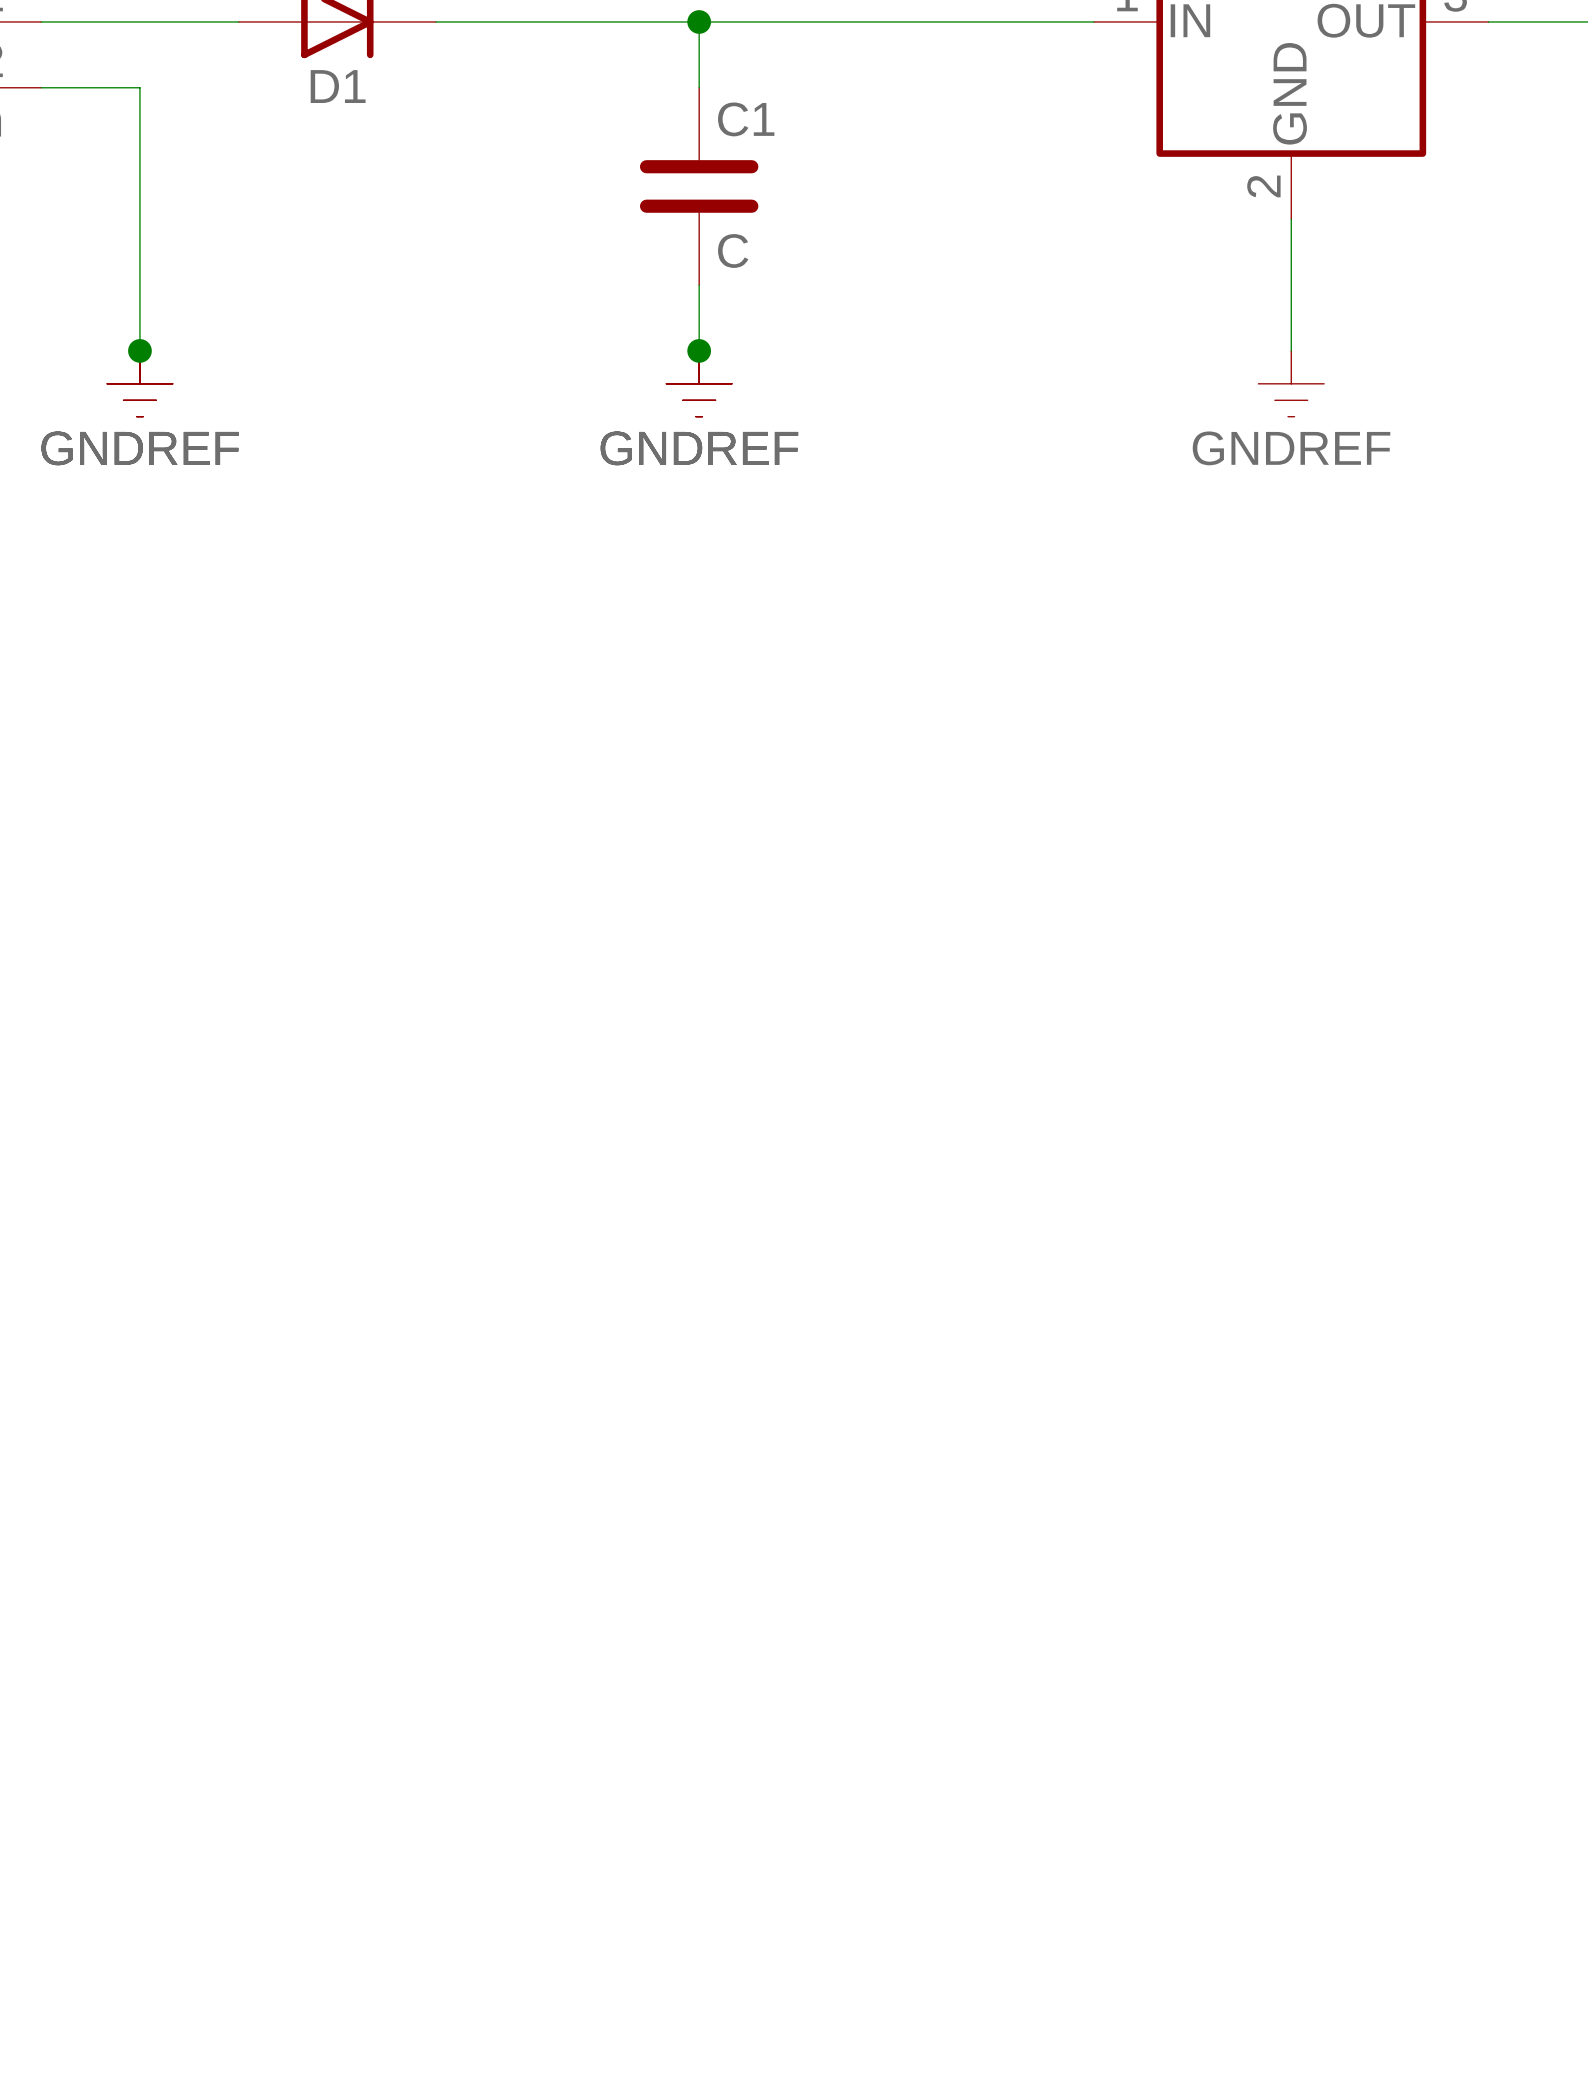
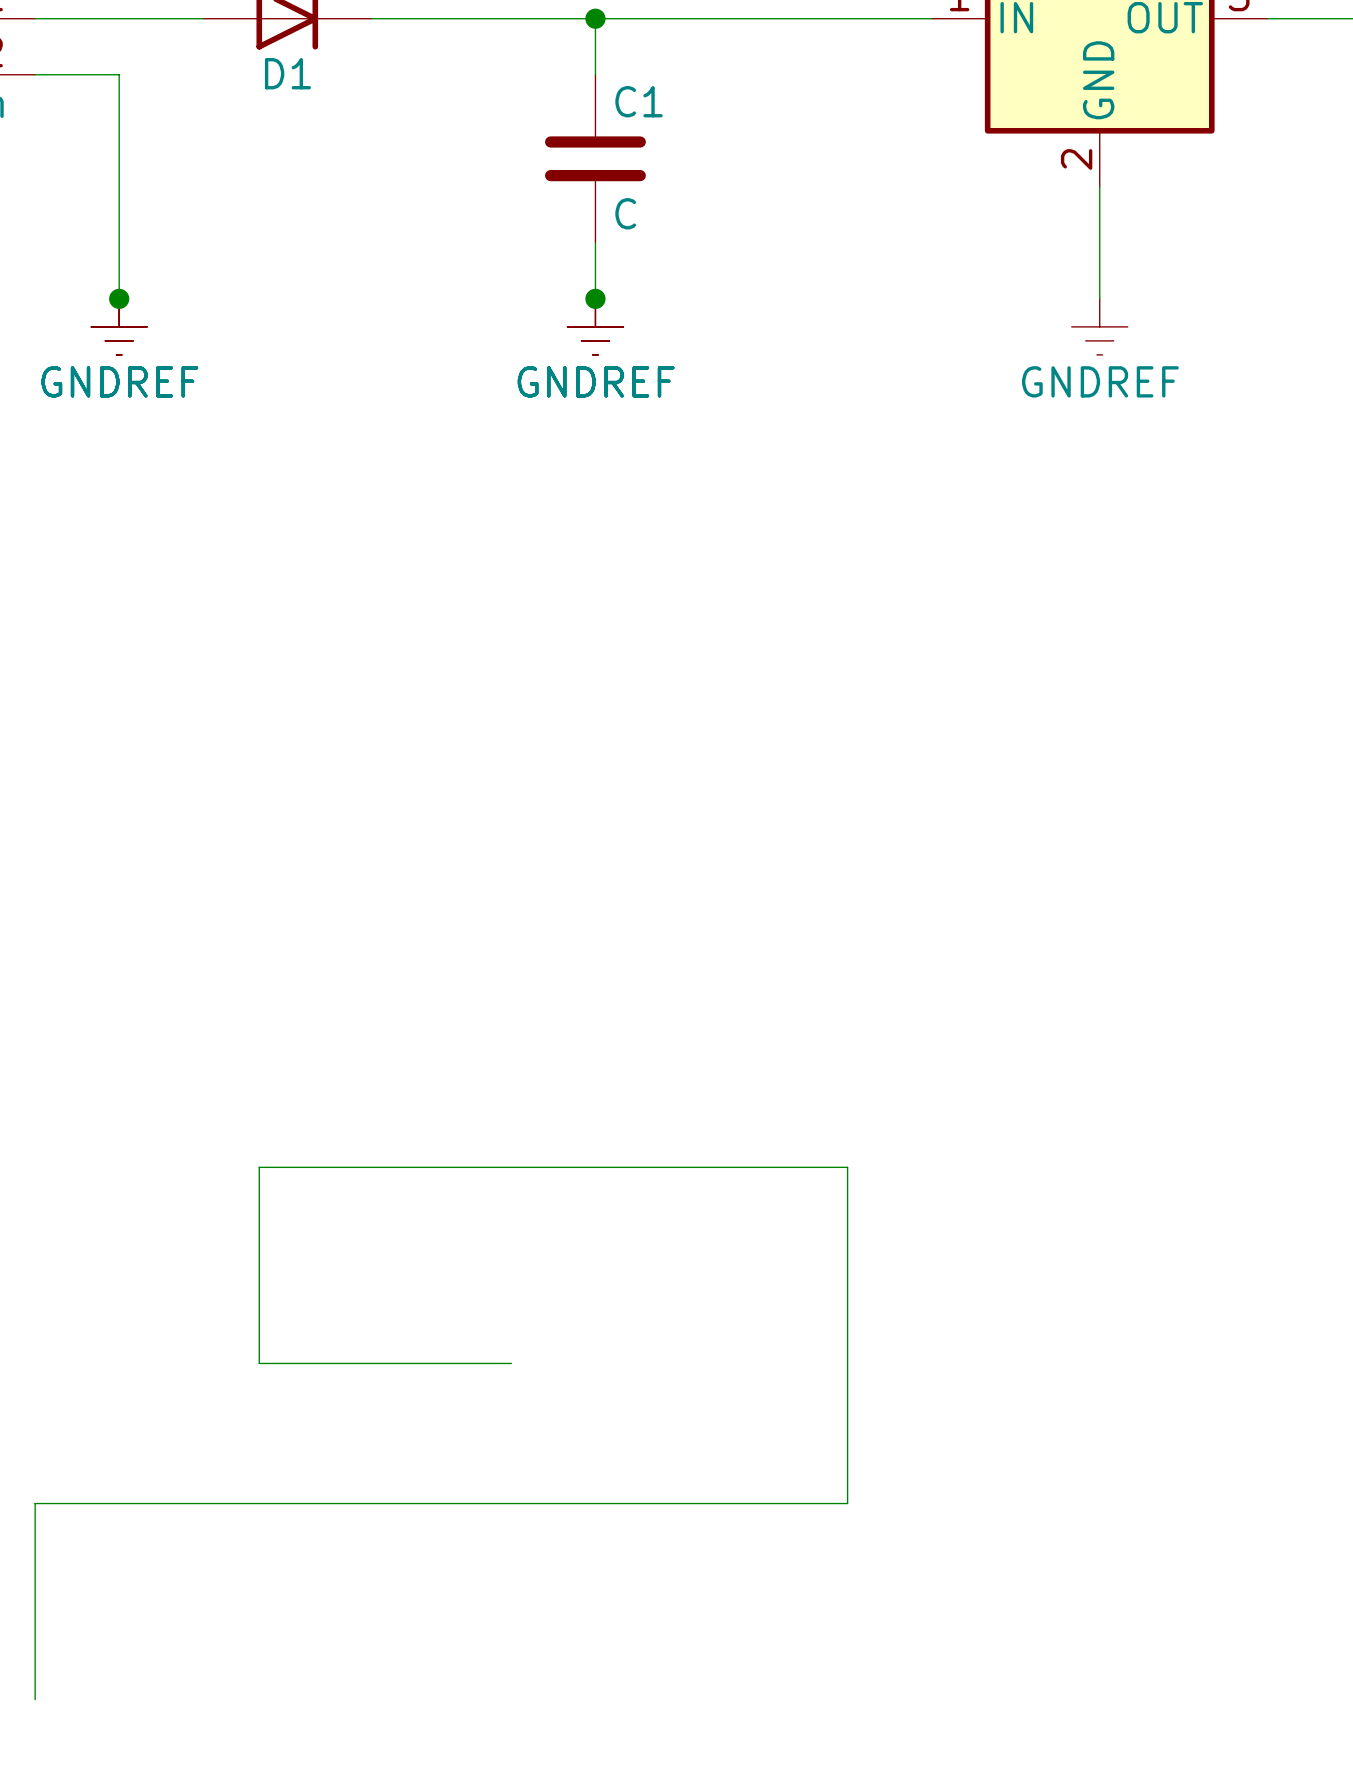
wire: none -> (511, 1363) (259, 1363) (259, 1167) (847, 1167) (847, 1503) (35, 1503) (35, 1699)

